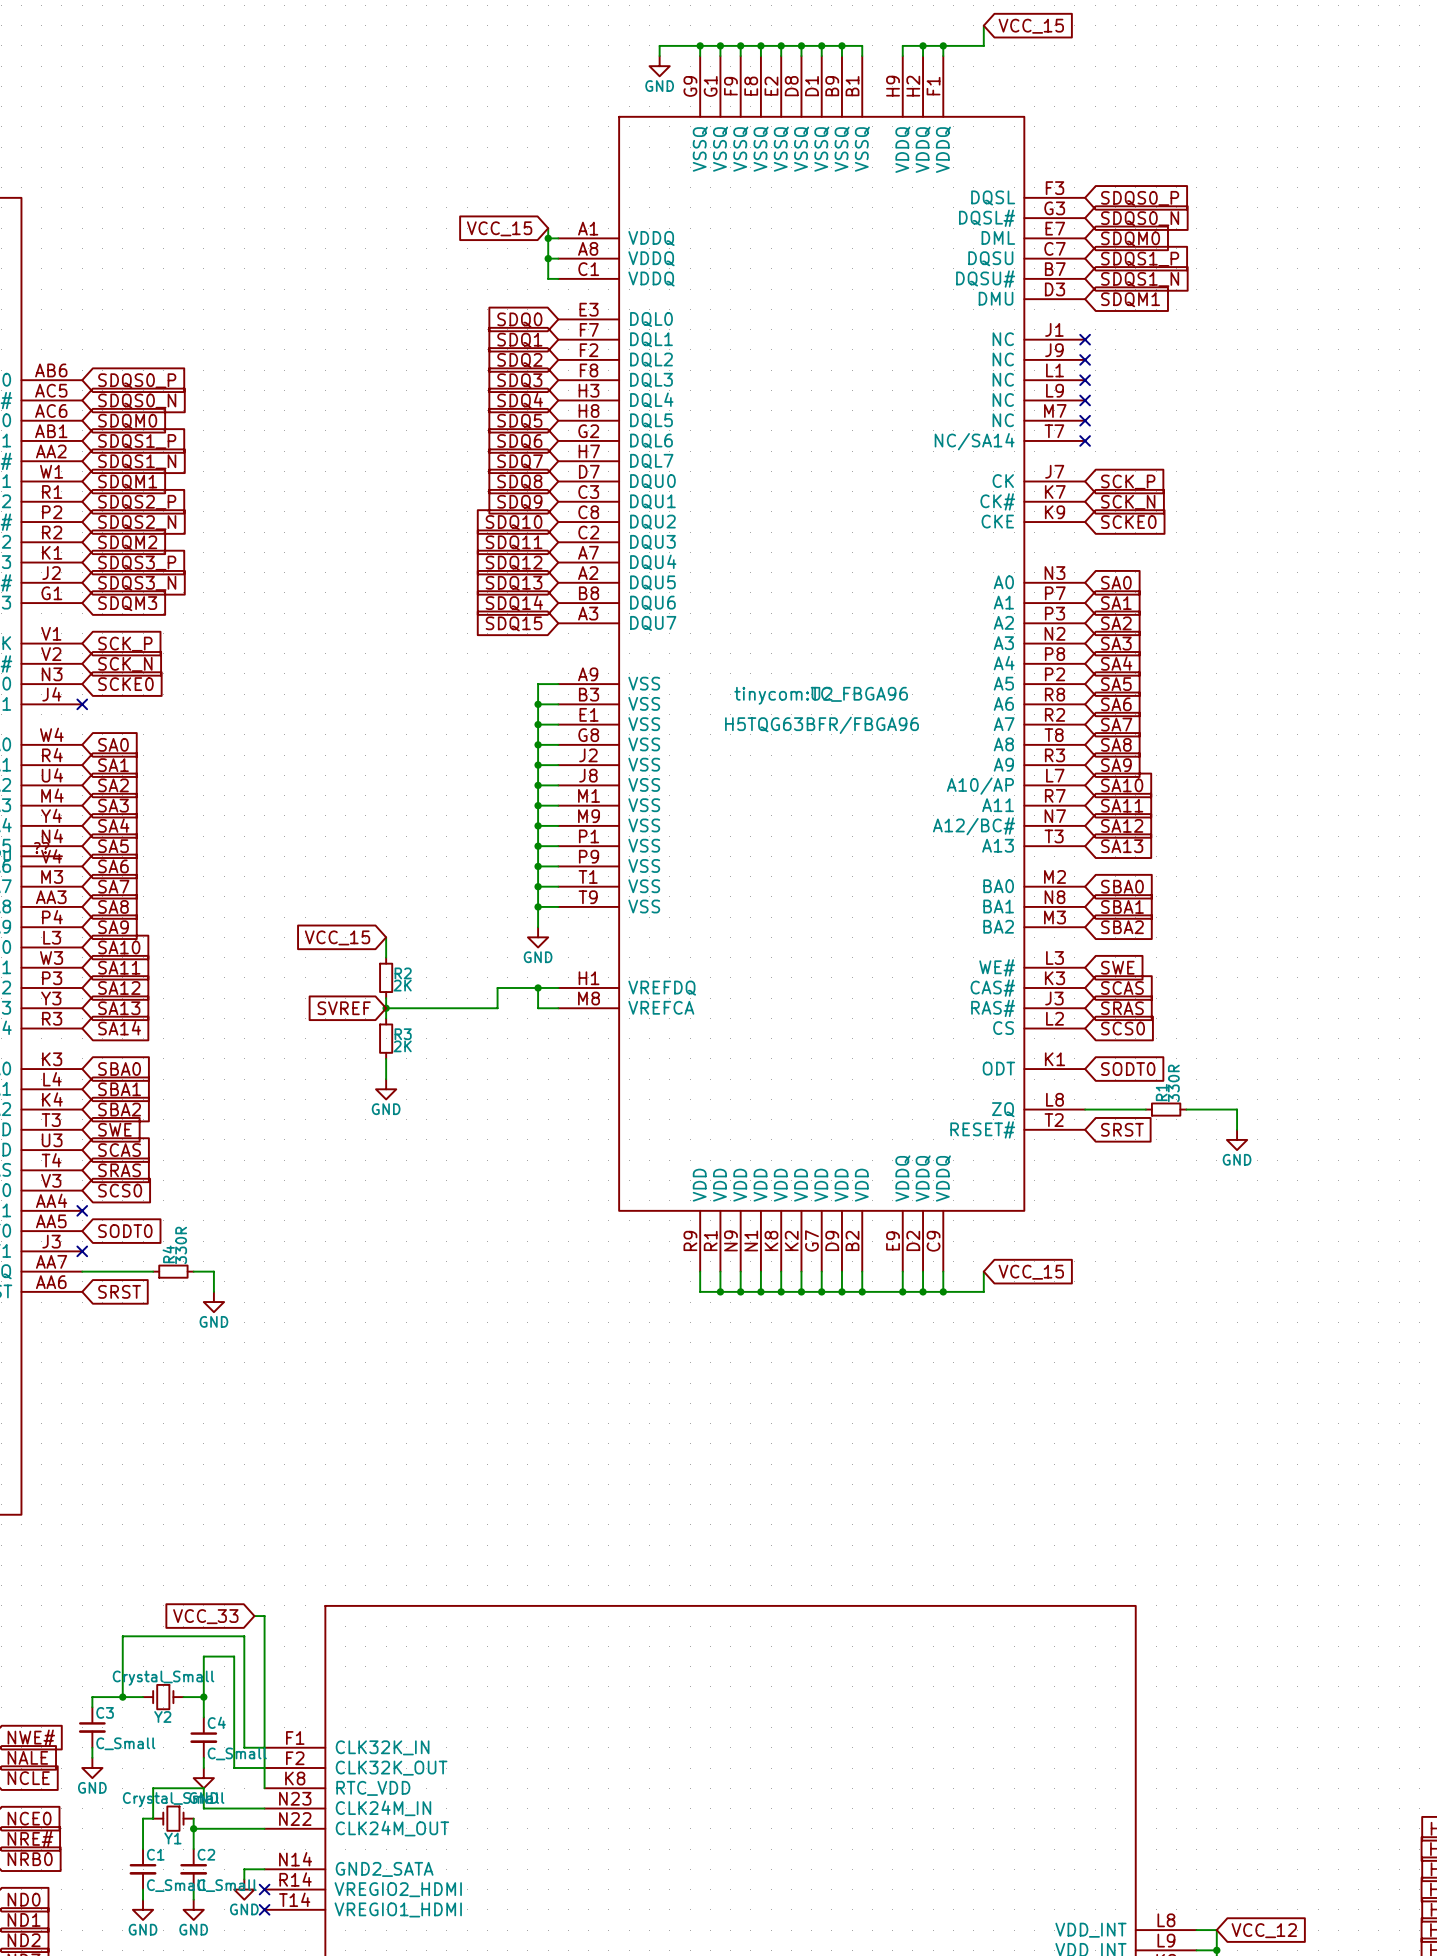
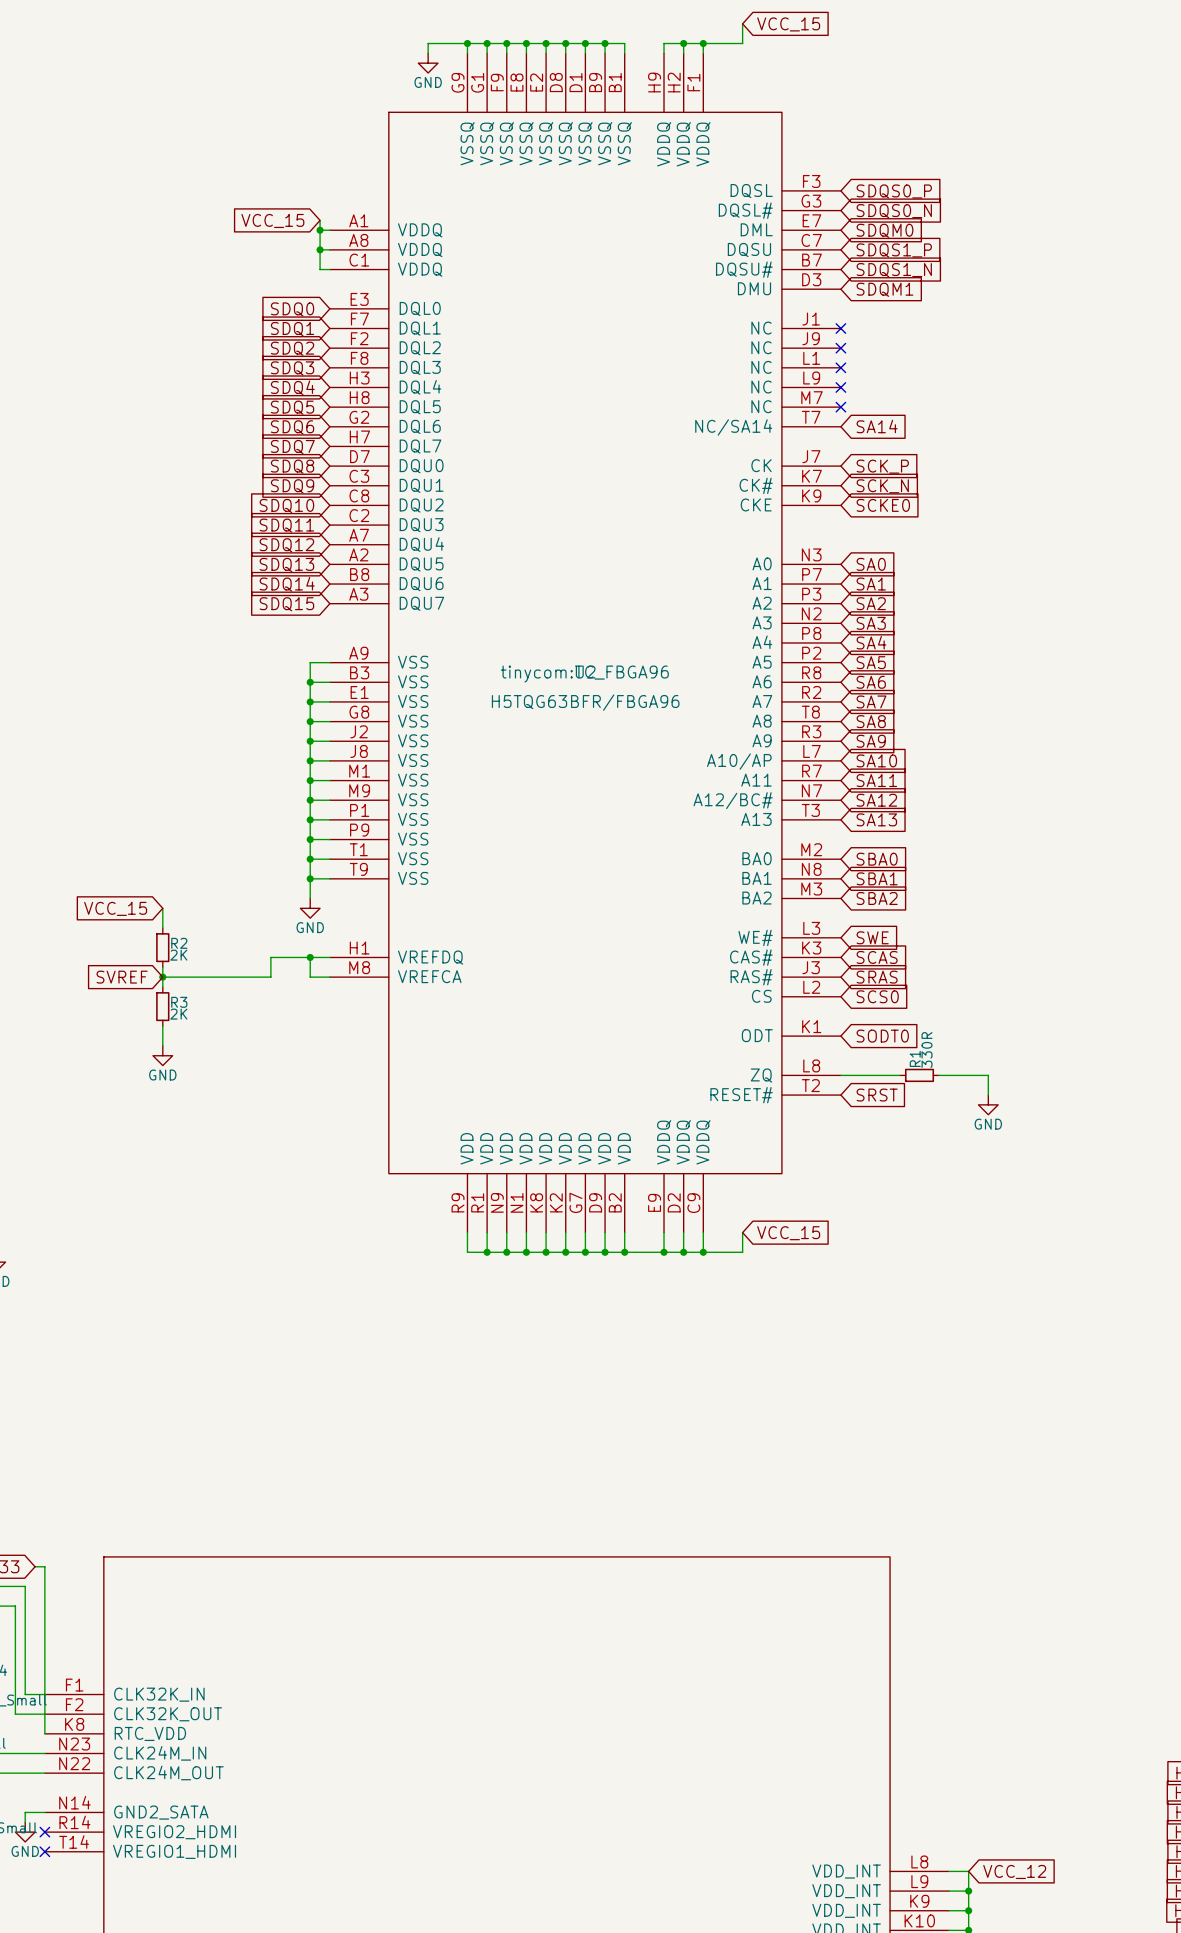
no-connect mark: (1085, 440) -> none
global label: none -> SA14 (877, 426)

